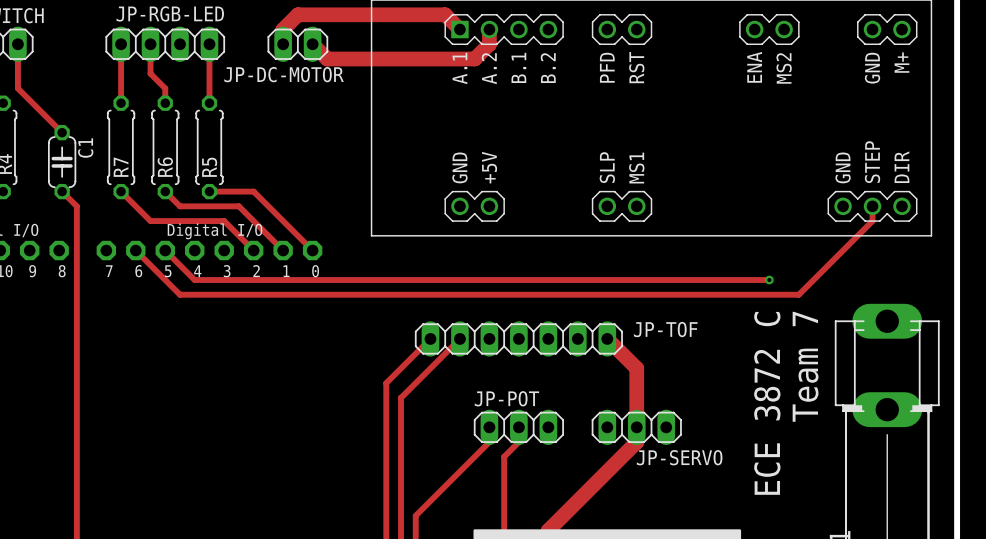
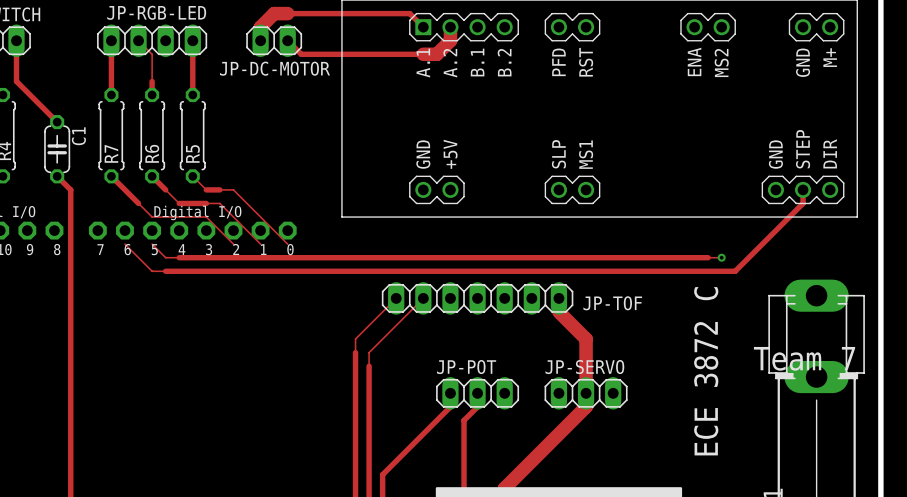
track width: thick (312, 14) (445, 14) (459, 29) -> thin (287, 13) (409, 13) (423, 27)
track: (150, 44) (150, 73) (165, 88) -> (138, 40) (152, 54) (152, 81)
track width: thick (312, 44) (327, 58) (459, 58) -> thin (287, 40) (301, 54) (423, 54)
JP-DC-MOTOR name position: JP-DC-MOTOR (284, 74) -> JP-DC-MOTOR (274, 68)
track: (209, 191) (253, 191) (312, 250) -> none
track: (180, 206) (224, 206) -> (192, 176) (206, 189)
track: (238, 206) (283, 250) -> (219, 189) (233, 189) (287, 244)
track: (150, 221) (194, 221) -> (165, 189) (179, 203)
track: none -> (138, 203) (152, 217) (206, 217) (233, 244)
track: (224, 221) (253, 250) -> (206, 203) (219, 203) (260, 244)
track: (135, 250) (180, 294) -> (124, 244) (152, 271) (165, 271)
track: (165, 250) (194, 280) -> (152, 244) (165, 257) (179, 257)
track: none -> (708, 257) (721, 257)
via position: (769, 280) -> (721, 257)
track: (430, 338) (386, 383) -> (396, 298) (355, 339) (355, 352)
track: (459, 338) (401, 397) -> (423, 298) (369, 352) (369, 366)
JP-TOF position: (518, 338) -> (477, 298)
text rotation: 0° (805, 366) -> 90° clockwise (804, 358)
JP-SERVO name position: JP-SERVO (679, 457) -> JP-SERVO (584, 367)

